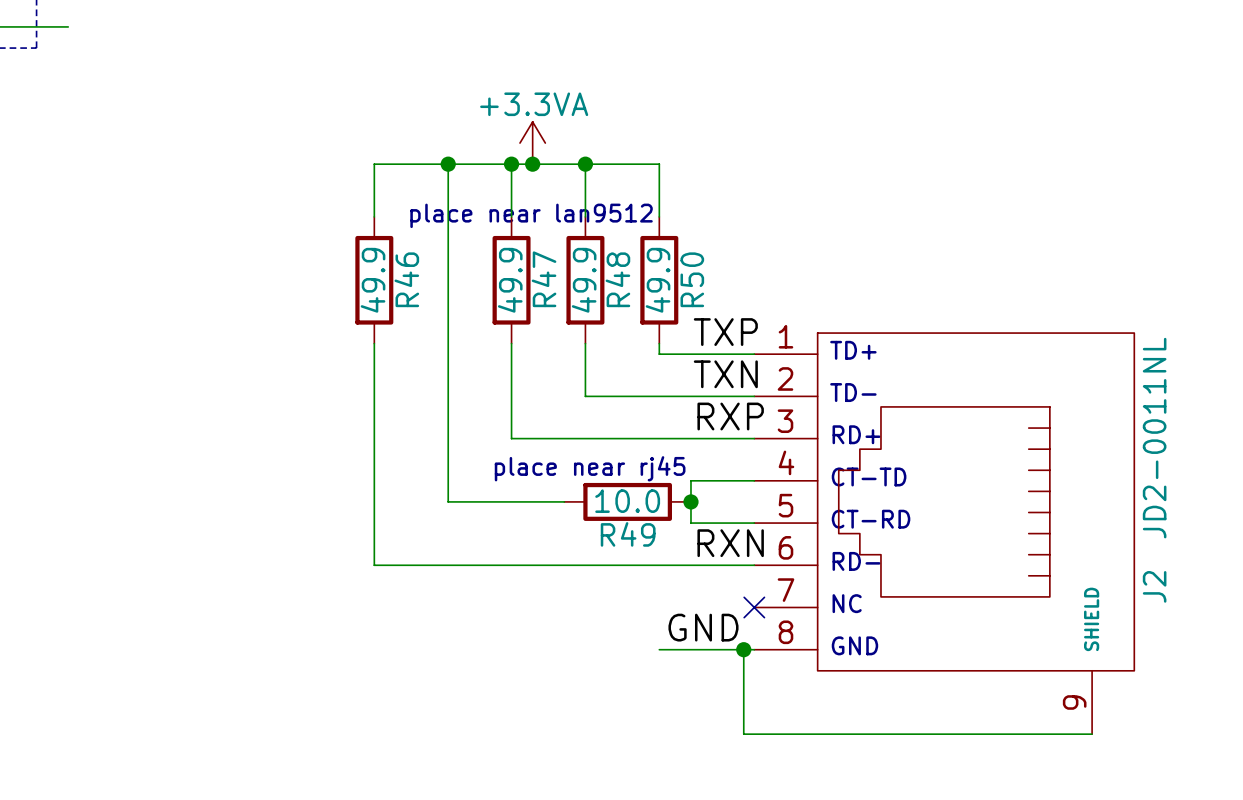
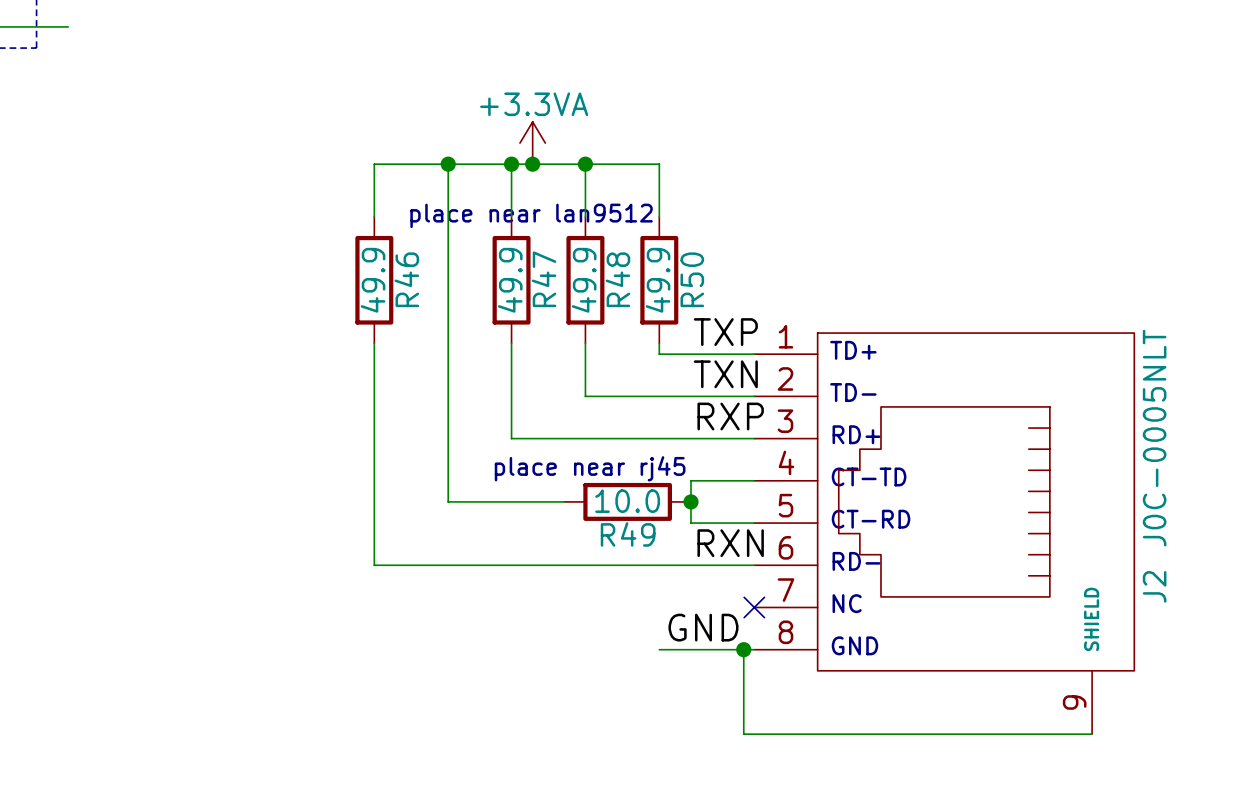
J2 value: JD2-0011NL (1154, 438) -> J0C-0005NLT (1154, 438)

